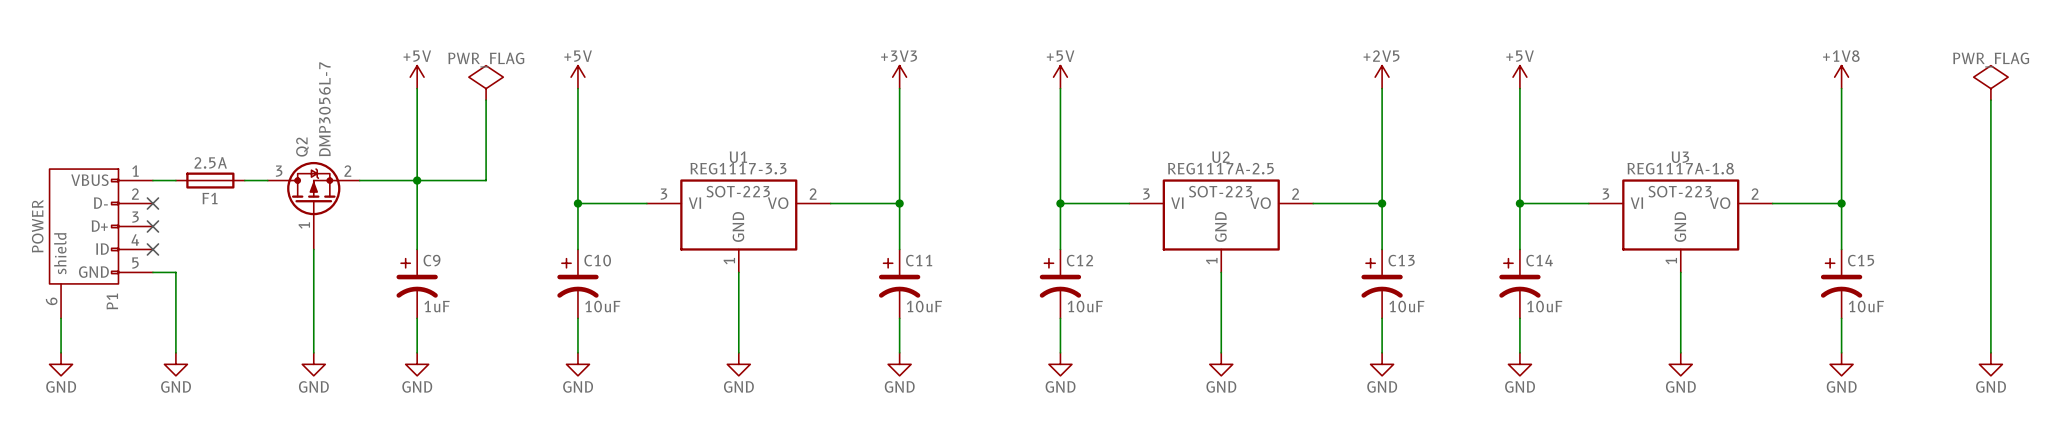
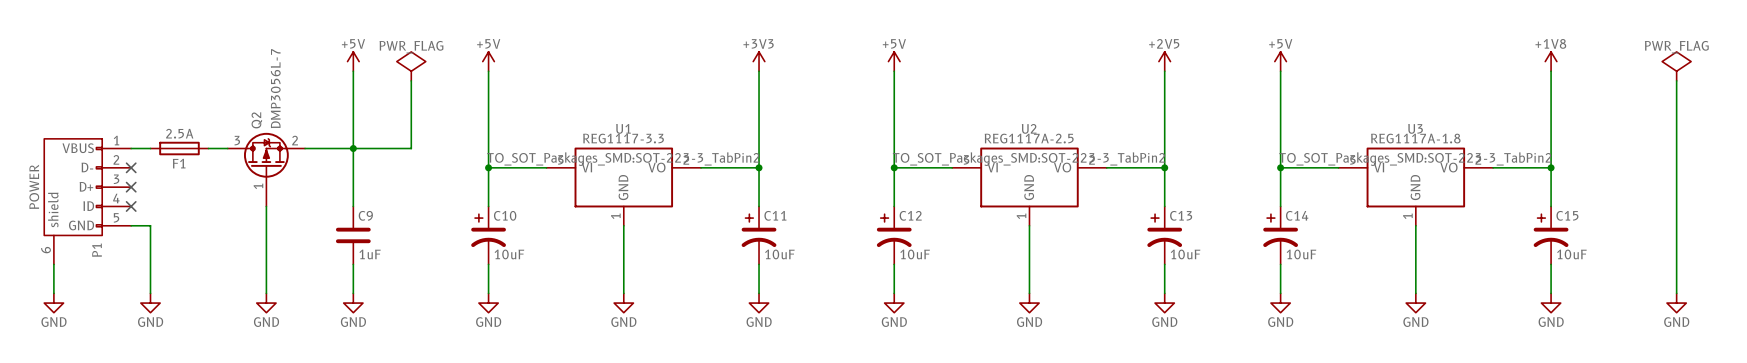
U1 text: SOT-223 (738, 191) -> TO_SOT_Packages_SMD:SOT-223-3_TabPin2 (623, 159)
U2 text: SOT-223 (1220, 191) -> TO_SOT_Packages_SMD:SOT-223-3_TabPin2 (1028, 159)
U3 text: SOT-223 (1680, 191) -> TO_SOT_Packages_SMD:SOT-223-3_TabPin2 (1415, 159)
C9 symbol: [396, 249, 438, 319] -> [335, 206, 371, 265]

